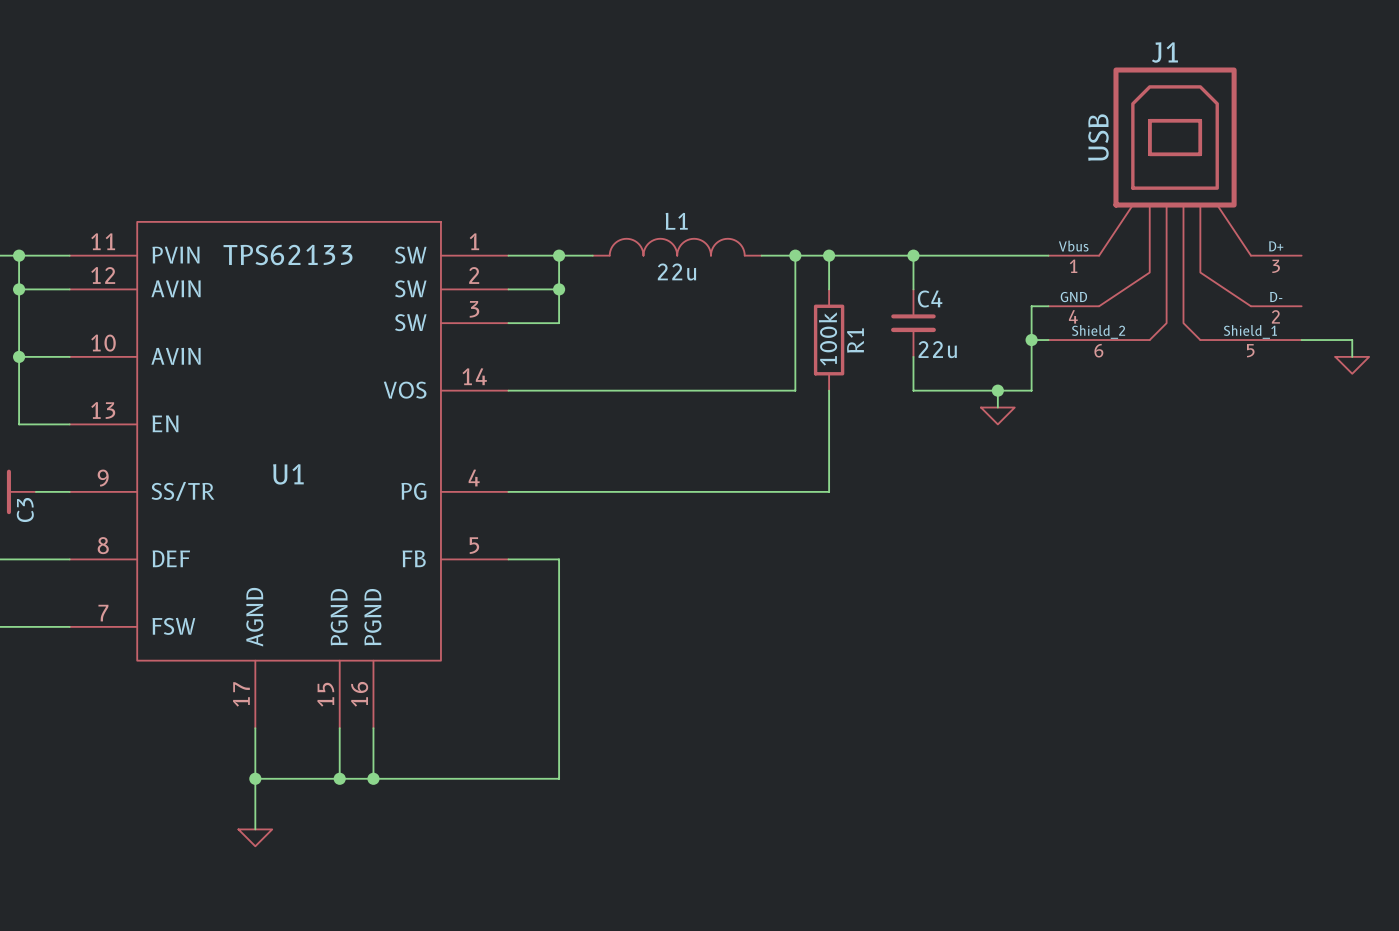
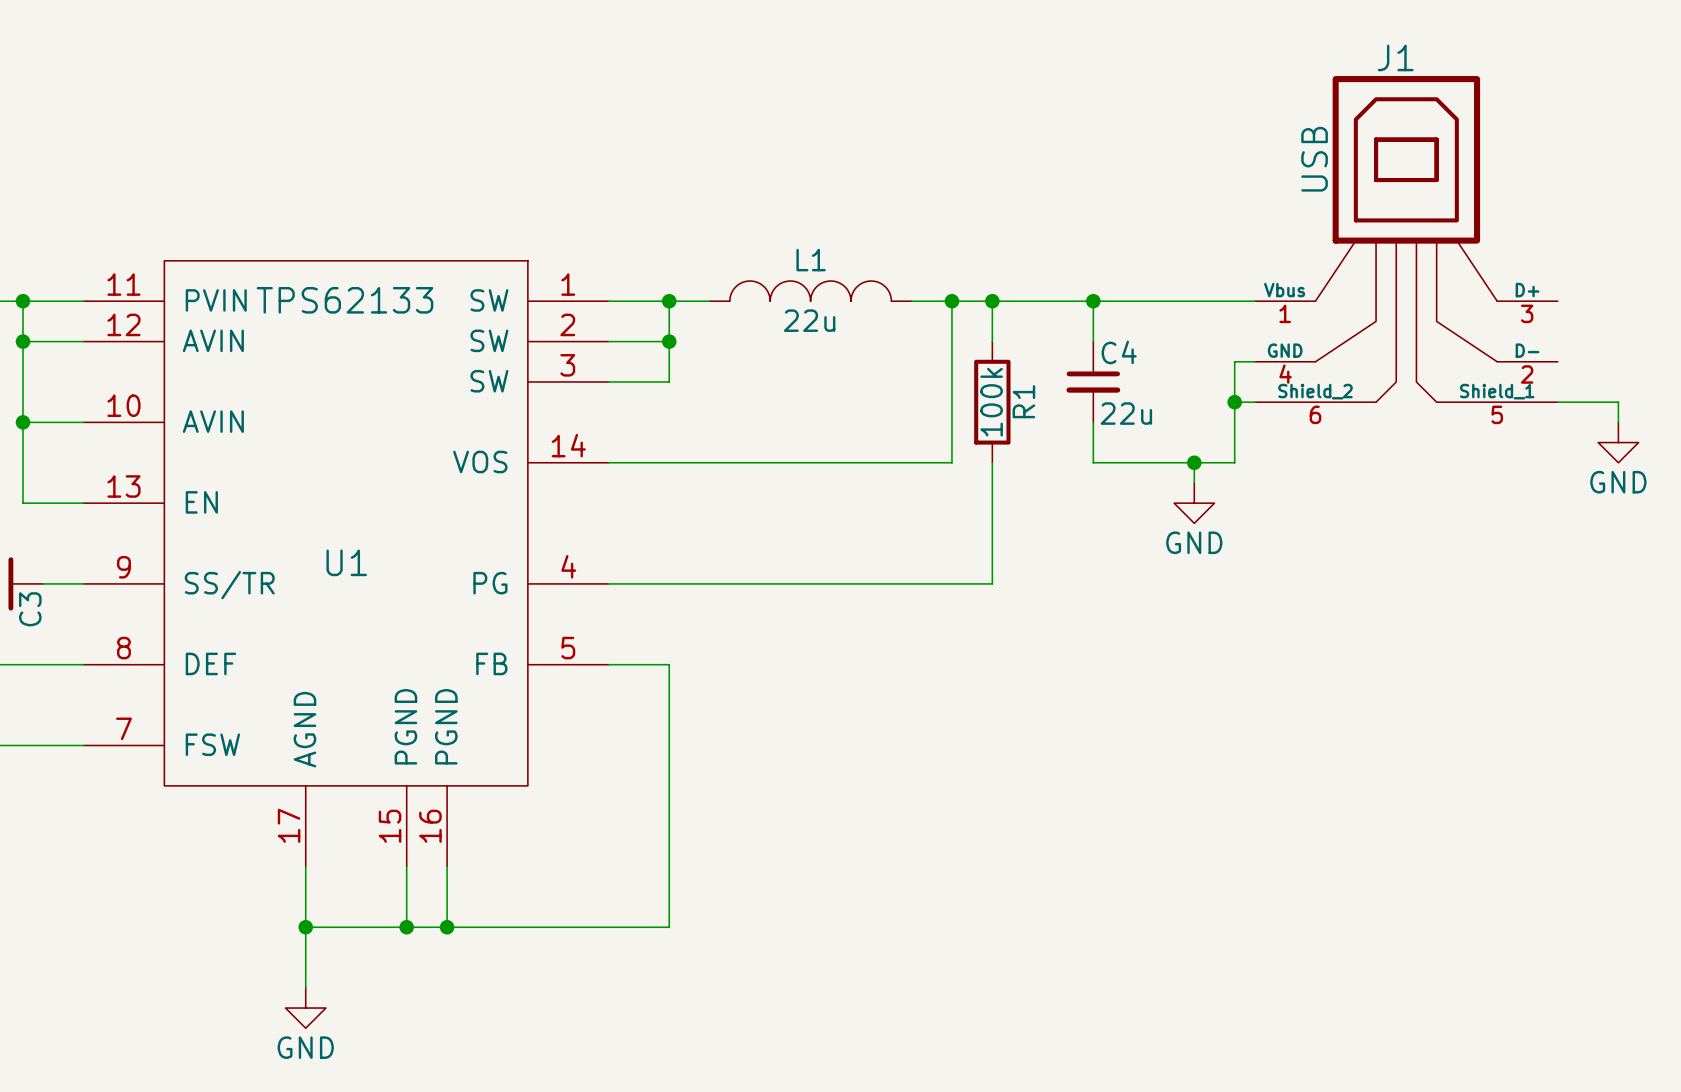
power symbol shape: [1335, 356, 1370, 374] -> [1598, 422, 1639, 463]
power symbol text: none -> GND (1618, 482)
power symbol shape: [980, 407, 1015, 425] -> [1174, 482, 1215, 524]
power symbol text: none -> GND (1194, 542)
power symbol shape: [238, 829, 273, 847] -> [285, 987, 326, 1029]
power symbol text: none -> GND (305, 1047)

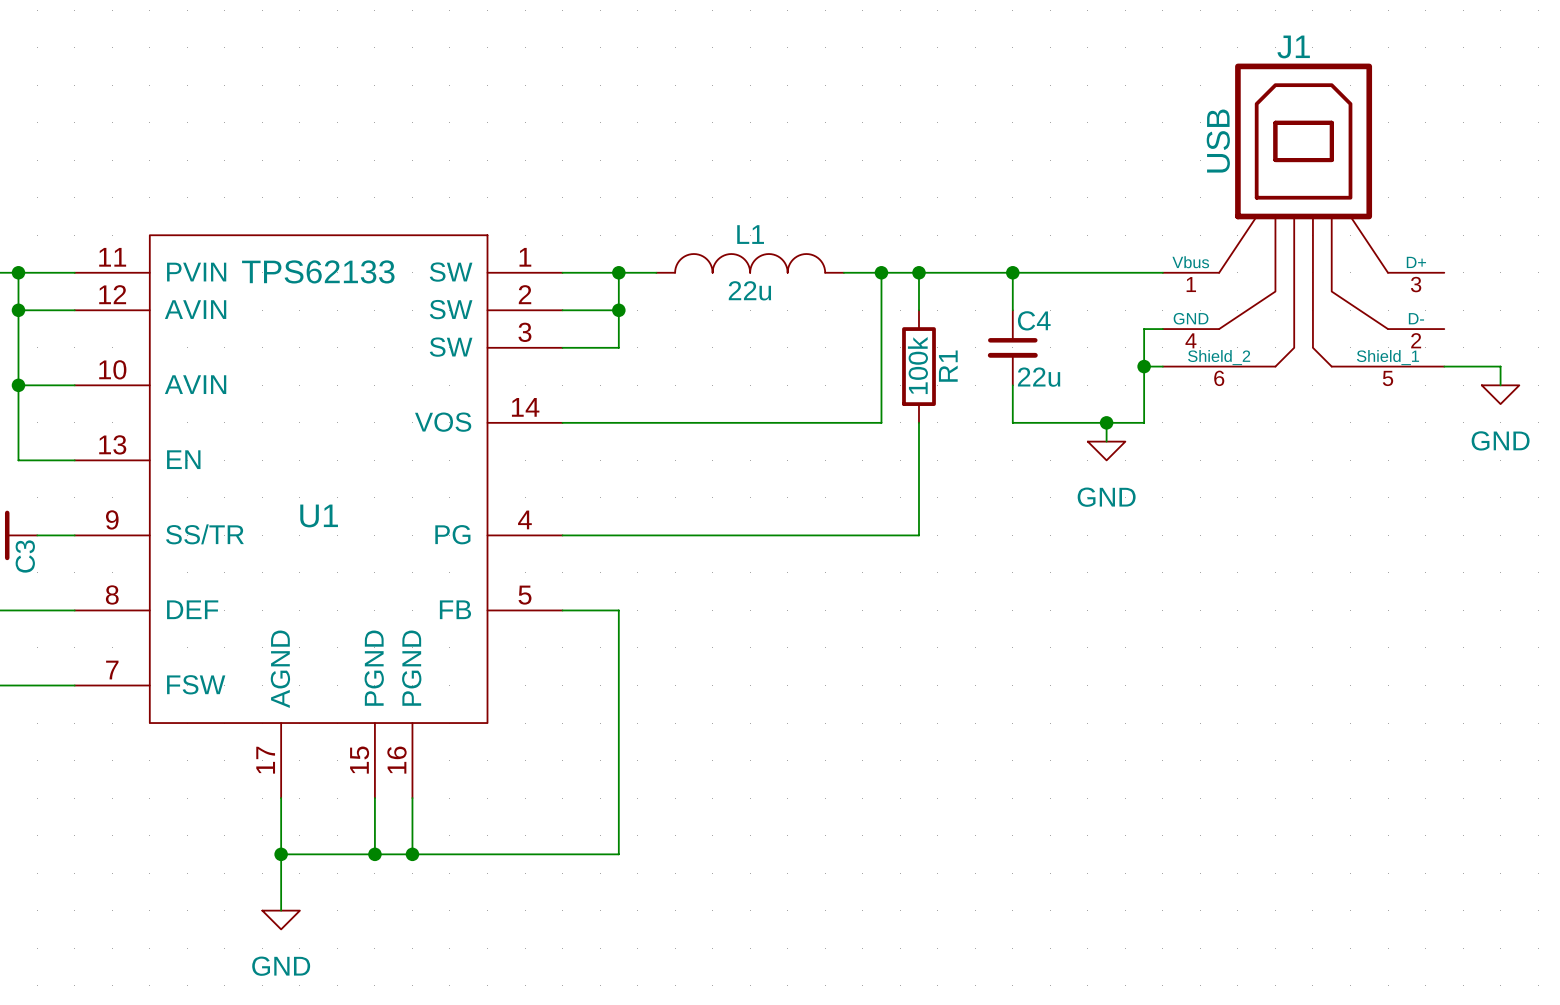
power symbol shape: [1598, 422, 1639, 463] -> [1481, 385, 1520, 405]
power symbol shape: [1174, 482, 1215, 524] -> [1087, 441, 1126, 461]
power symbol shape: [285, 987, 326, 1029] -> [262, 910, 300, 930]

